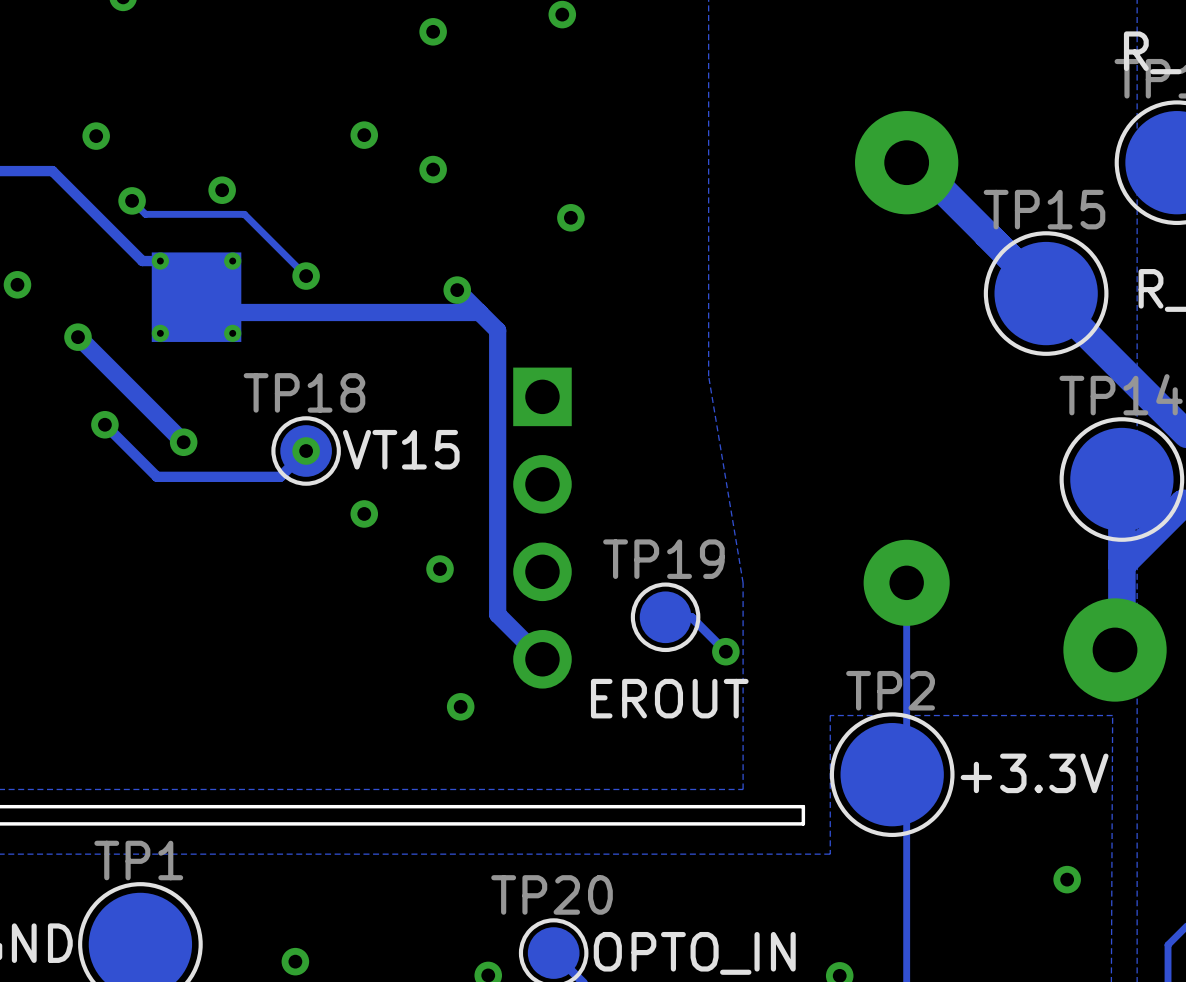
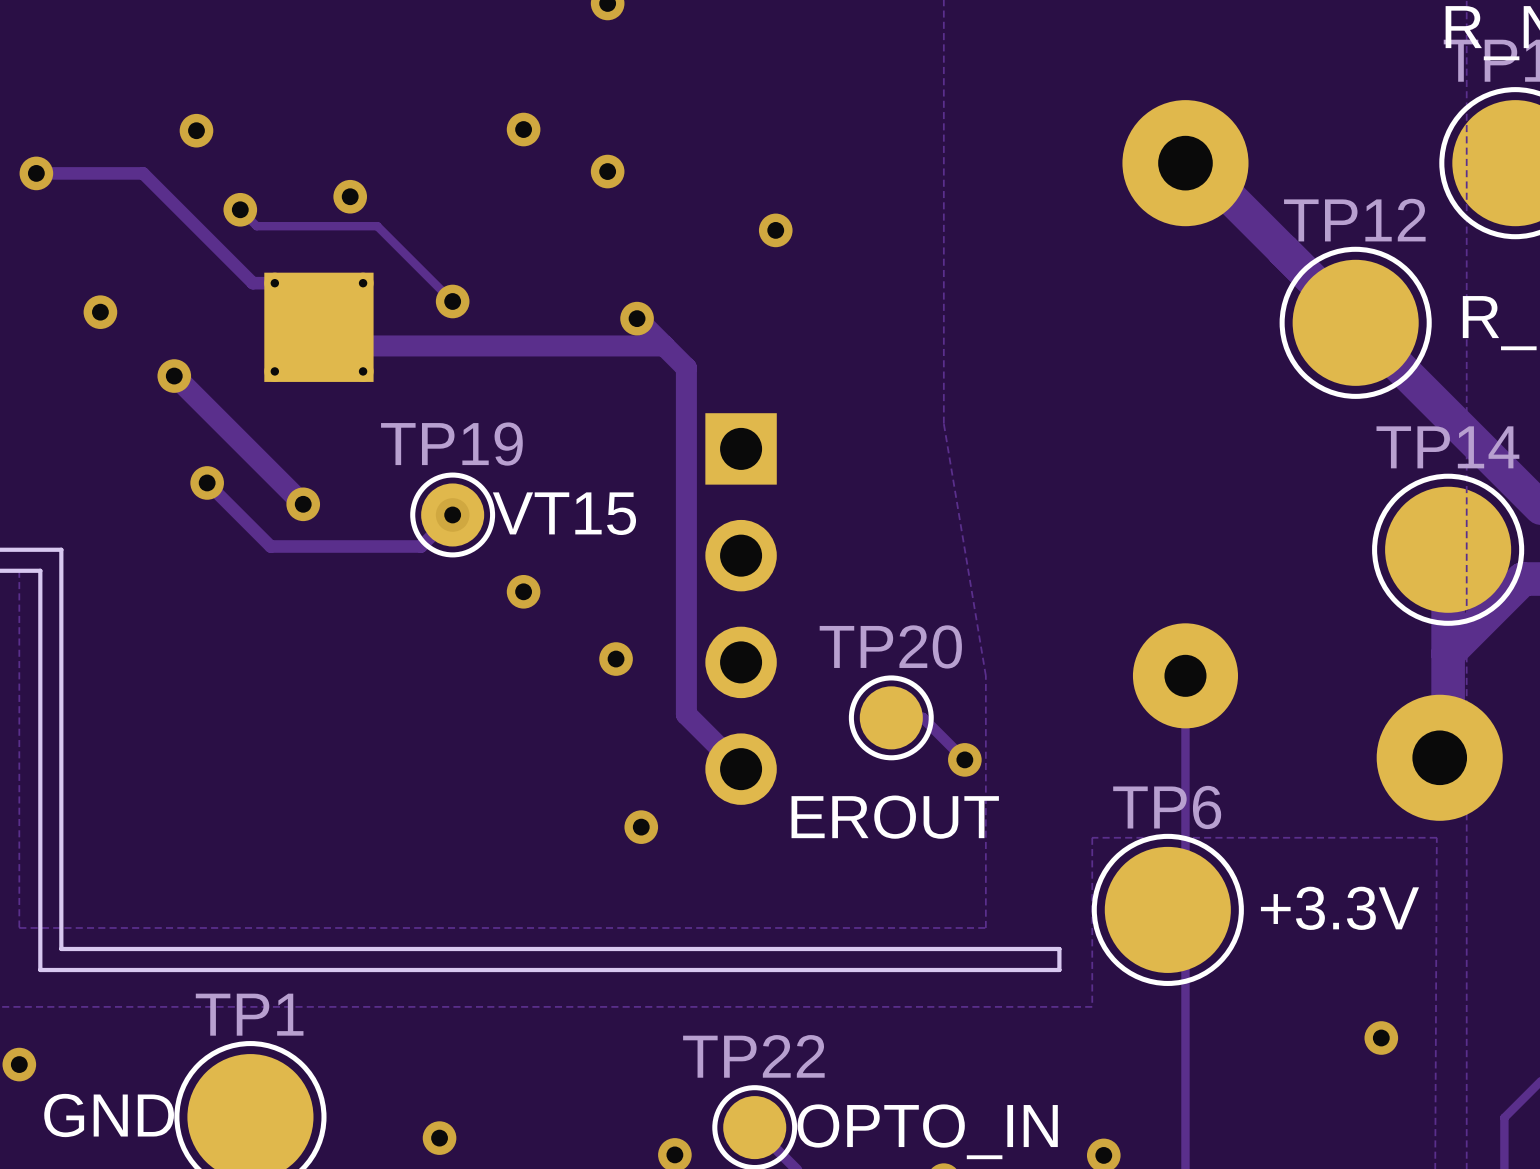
TP15 name: TP15 (1044, 209) -> TP12 (1354, 220)
TP18 name: TP18 (304, 392) -> TP19 (451, 444)
TP19 name: TP19 (663, 559) -> TP20 (890, 646)
TP2 name: TP2 (890, 690) -> TP6 (1167, 807)
TP20 name: TP20 (552, 894) -> TP22 (753, 1056)

